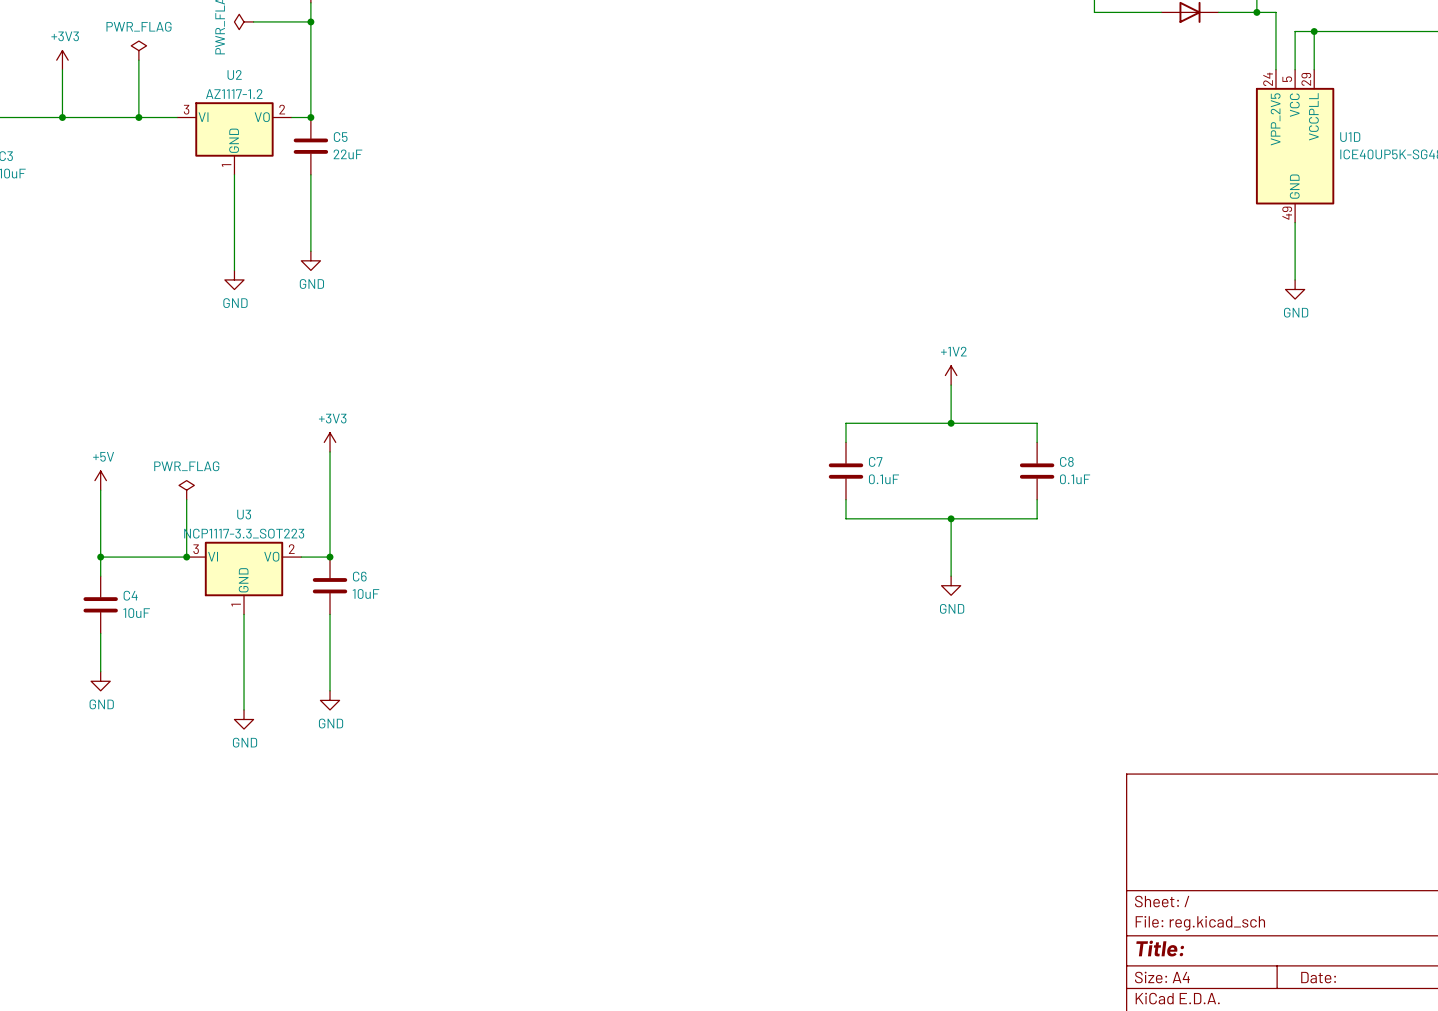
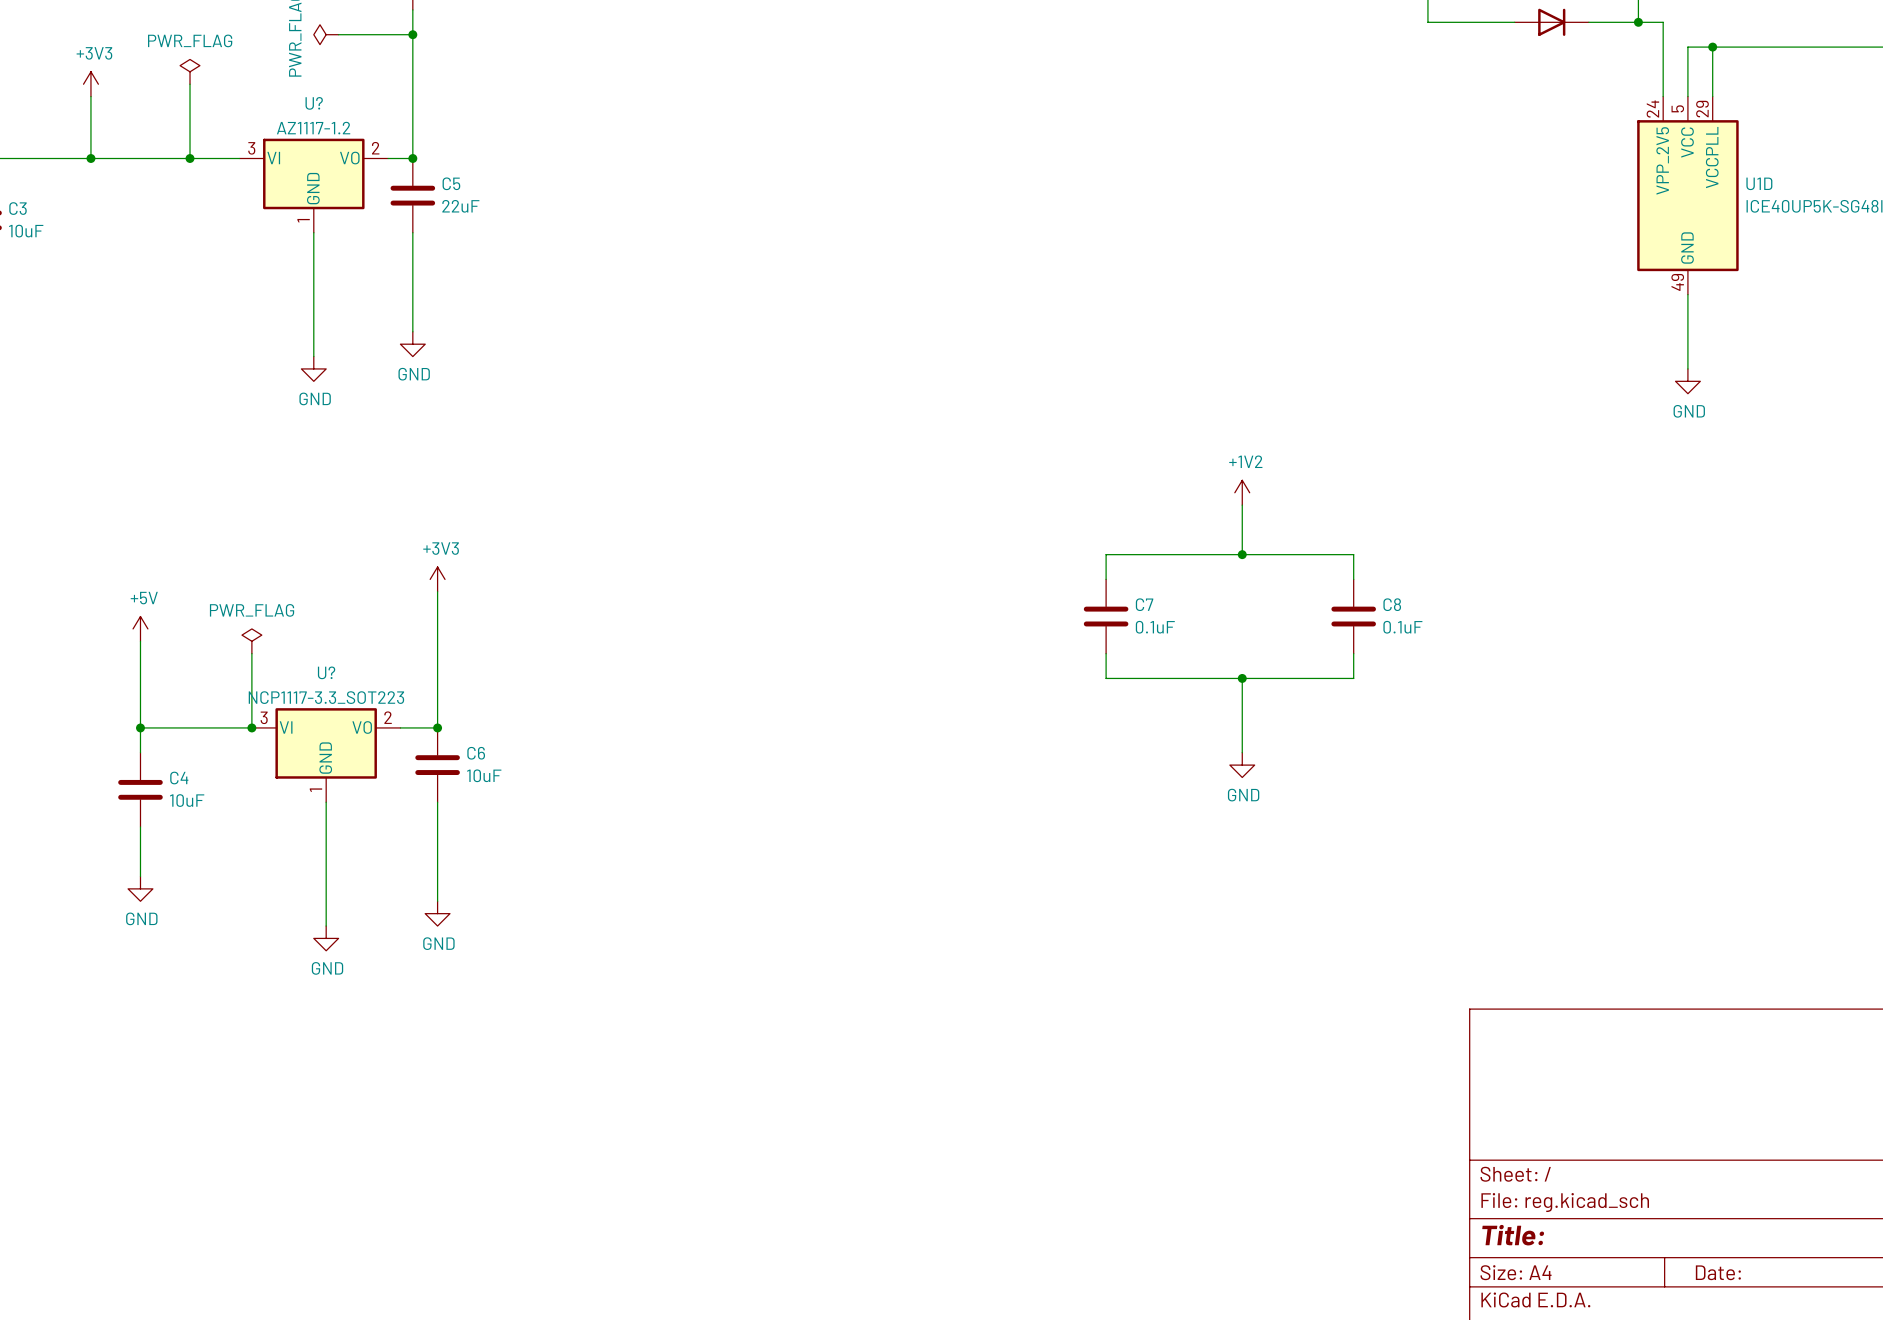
U2 name: U2 (234, 74) -> U? (314, 103)
U3 name: U3 (244, 514) -> U? (326, 672)

